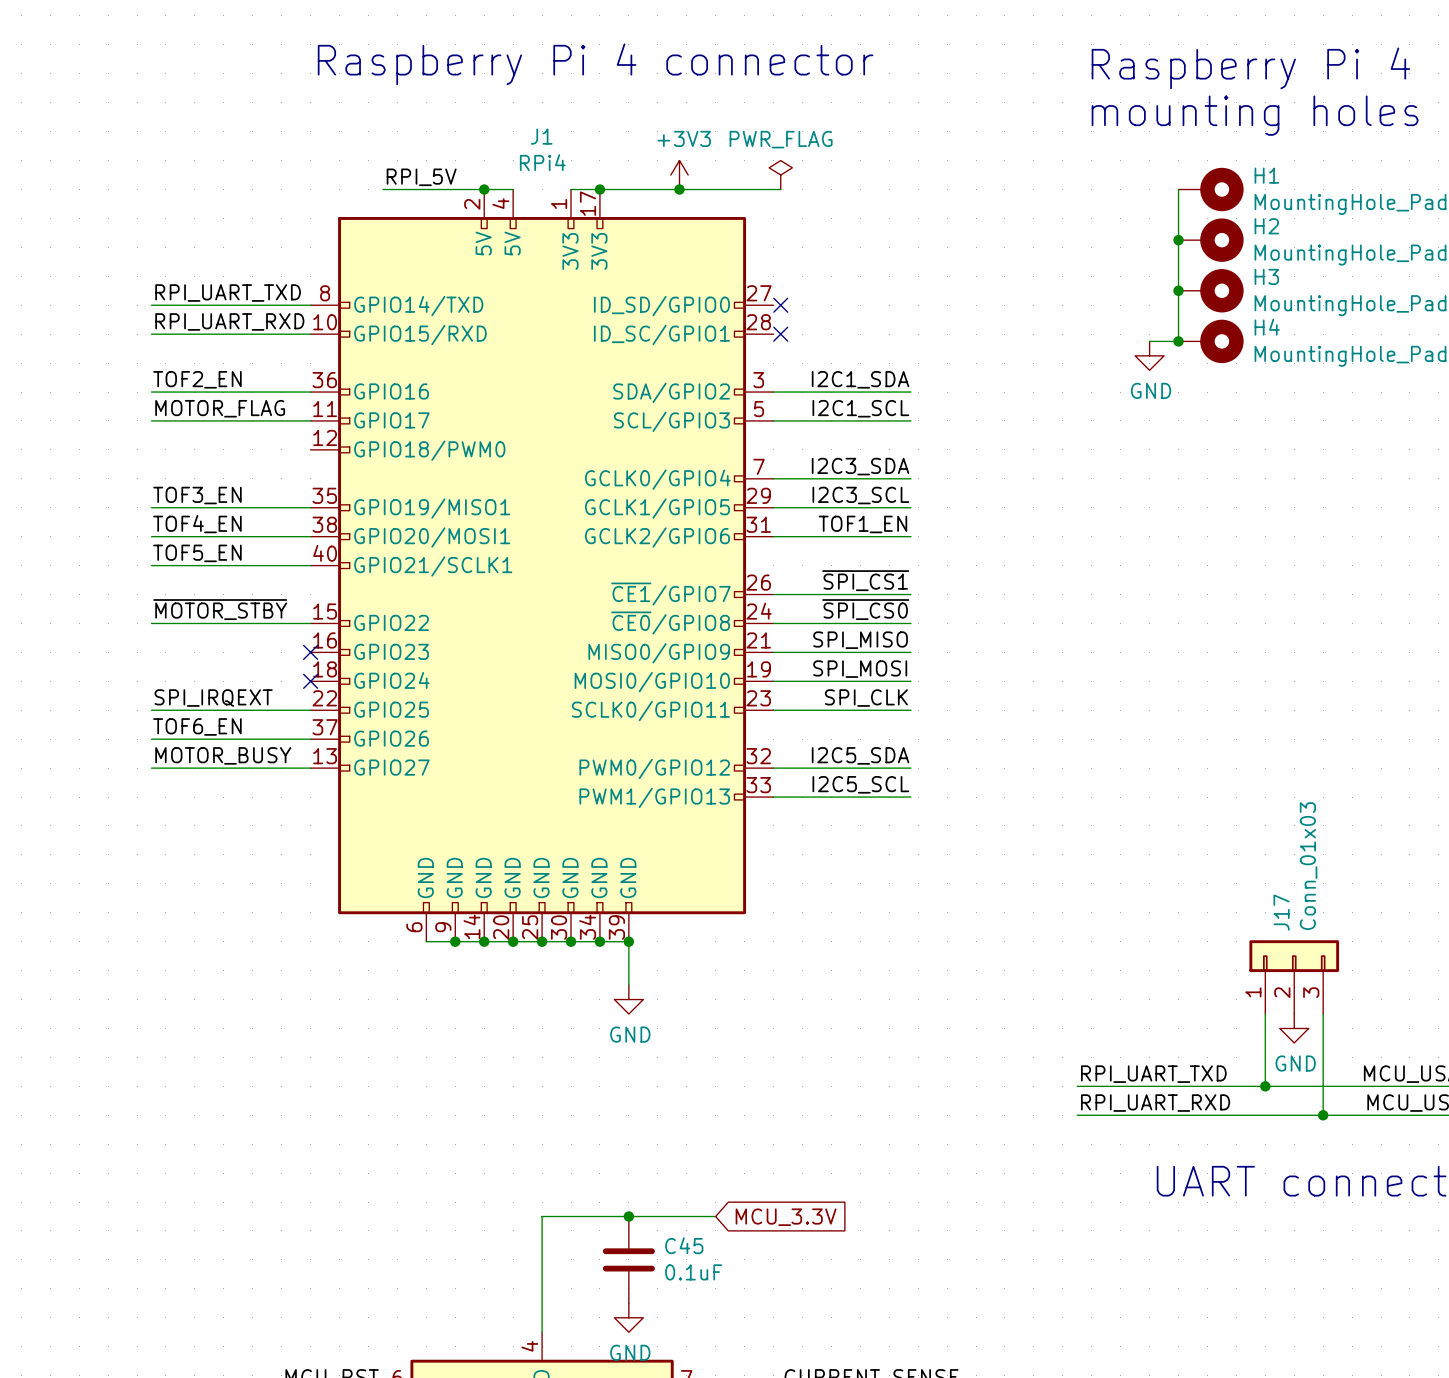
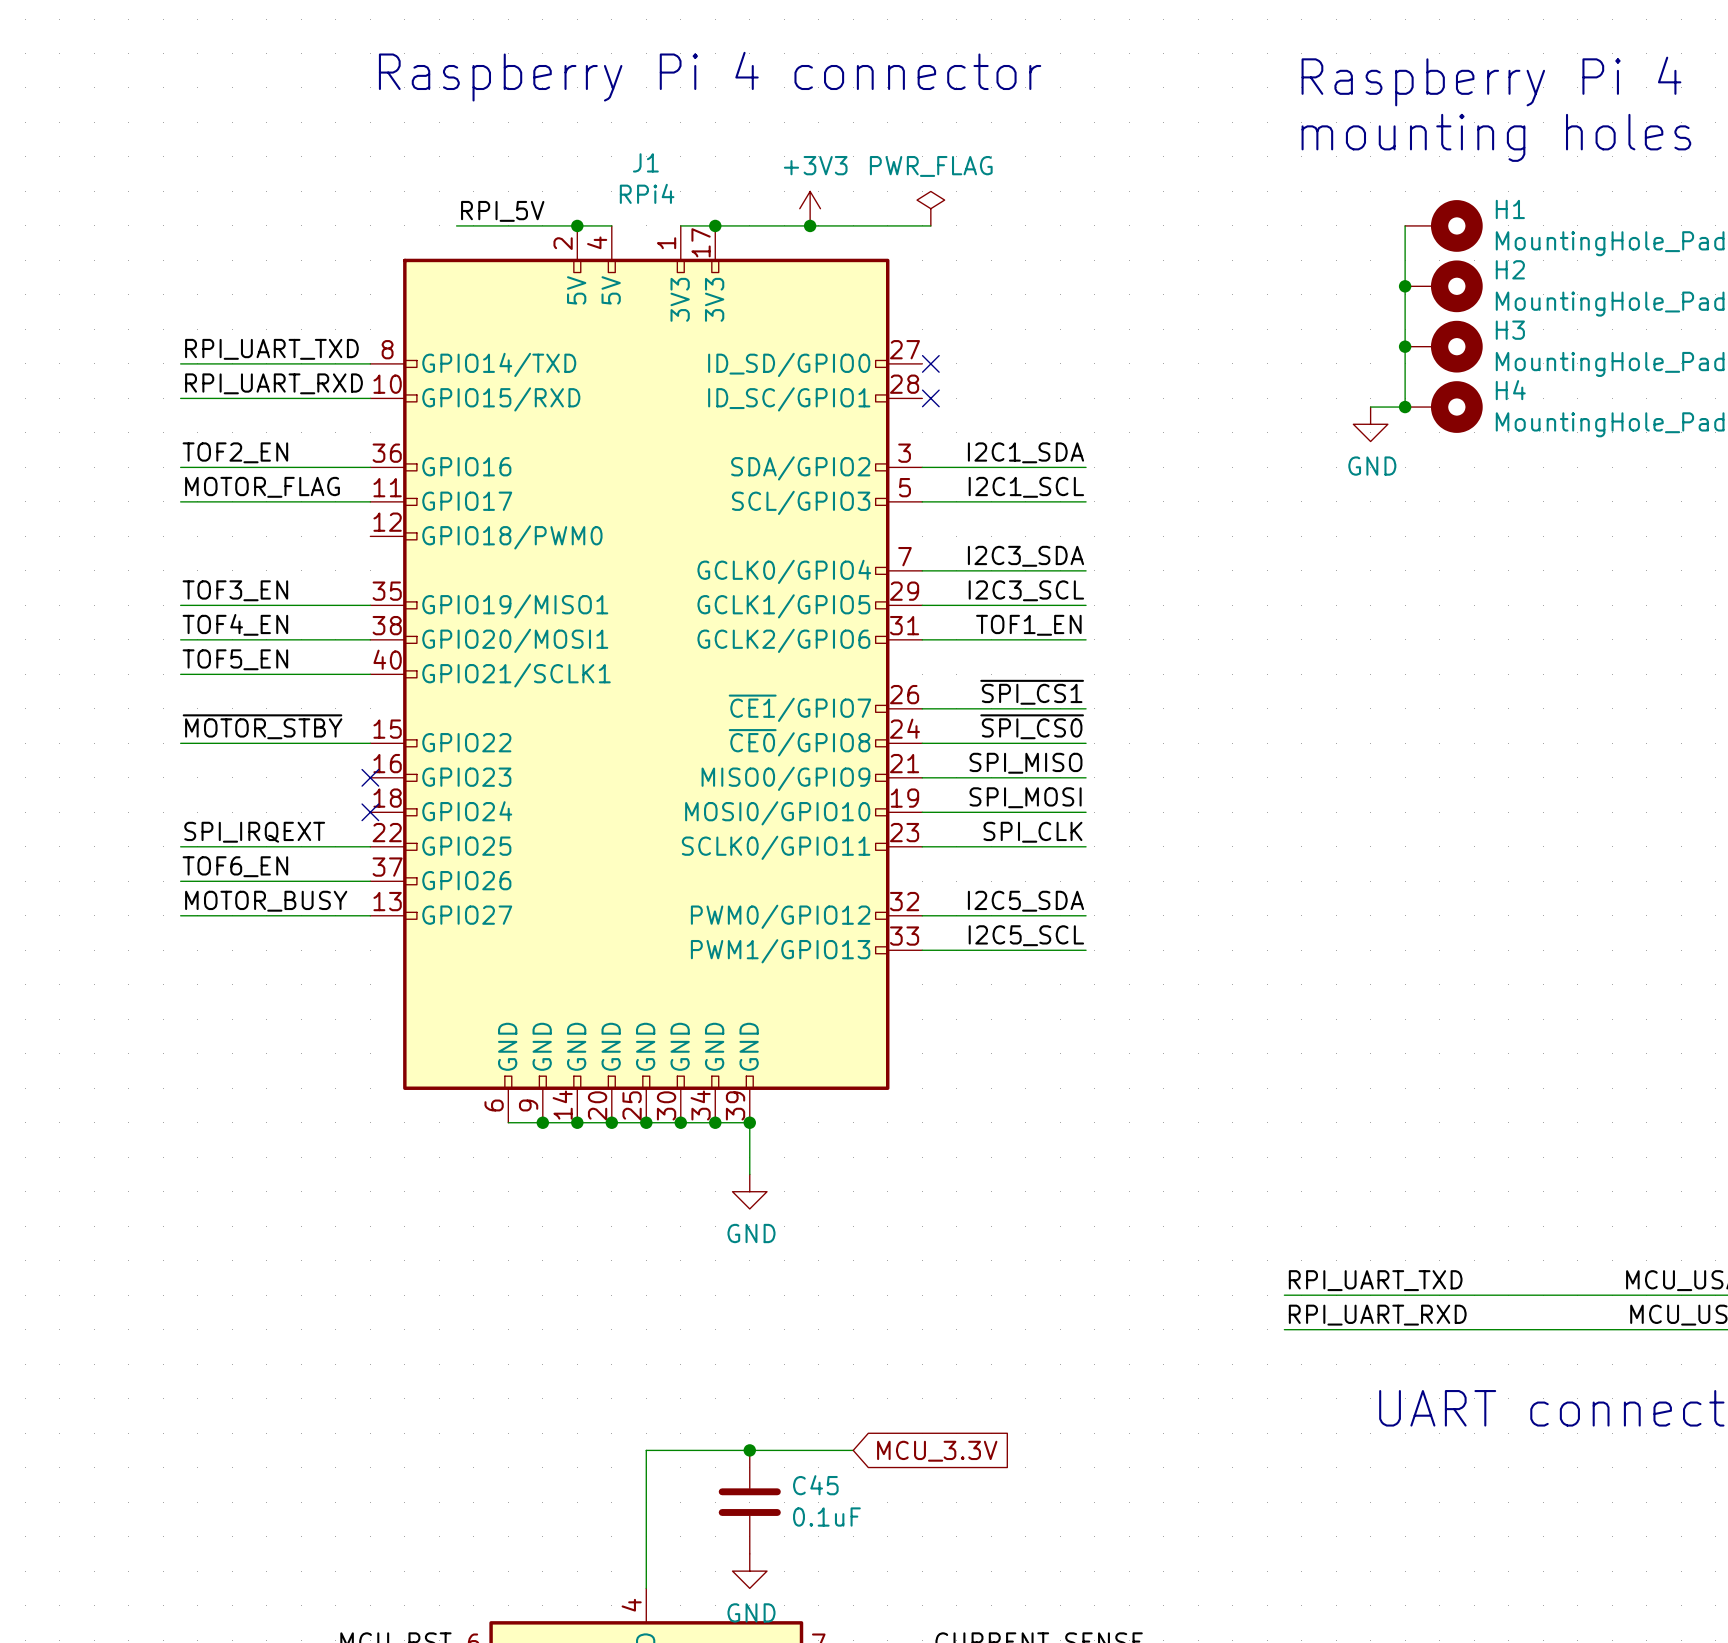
J17: Conn_01x03 (1294, 977) -> none
wire: (1265, 1014) (1265, 1086) -> none
wire: (1323, 1014) (1323, 1115) -> none
power symbol: GND (1294, 1028) -> none
junction: (1265, 1086) -> none
junction: (1323, 1115) -> none

